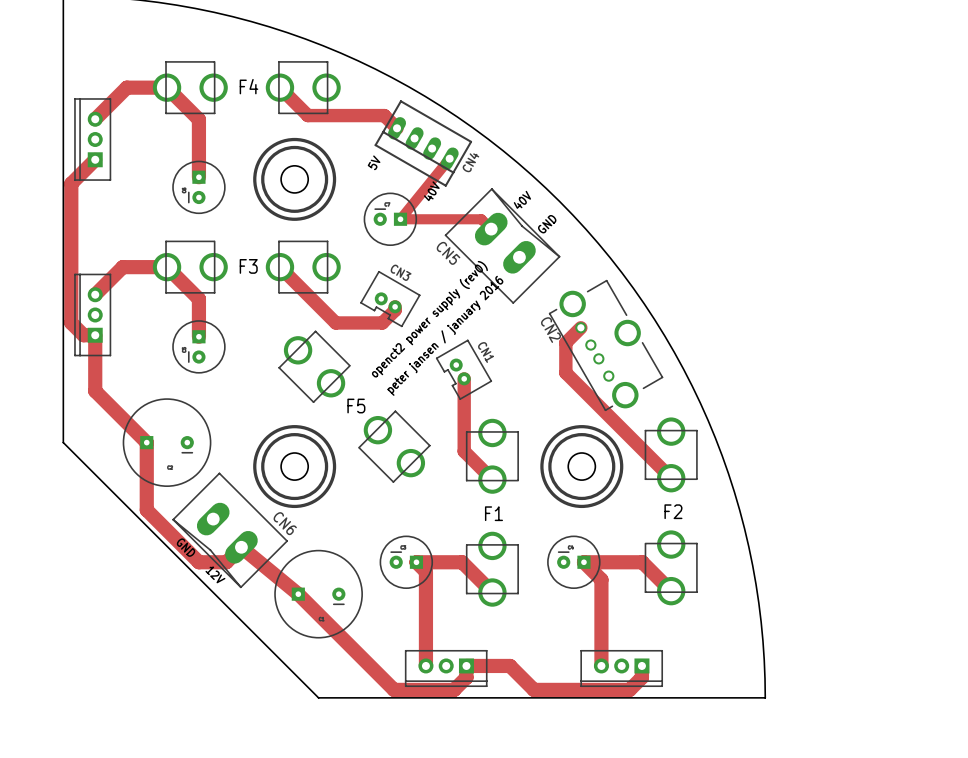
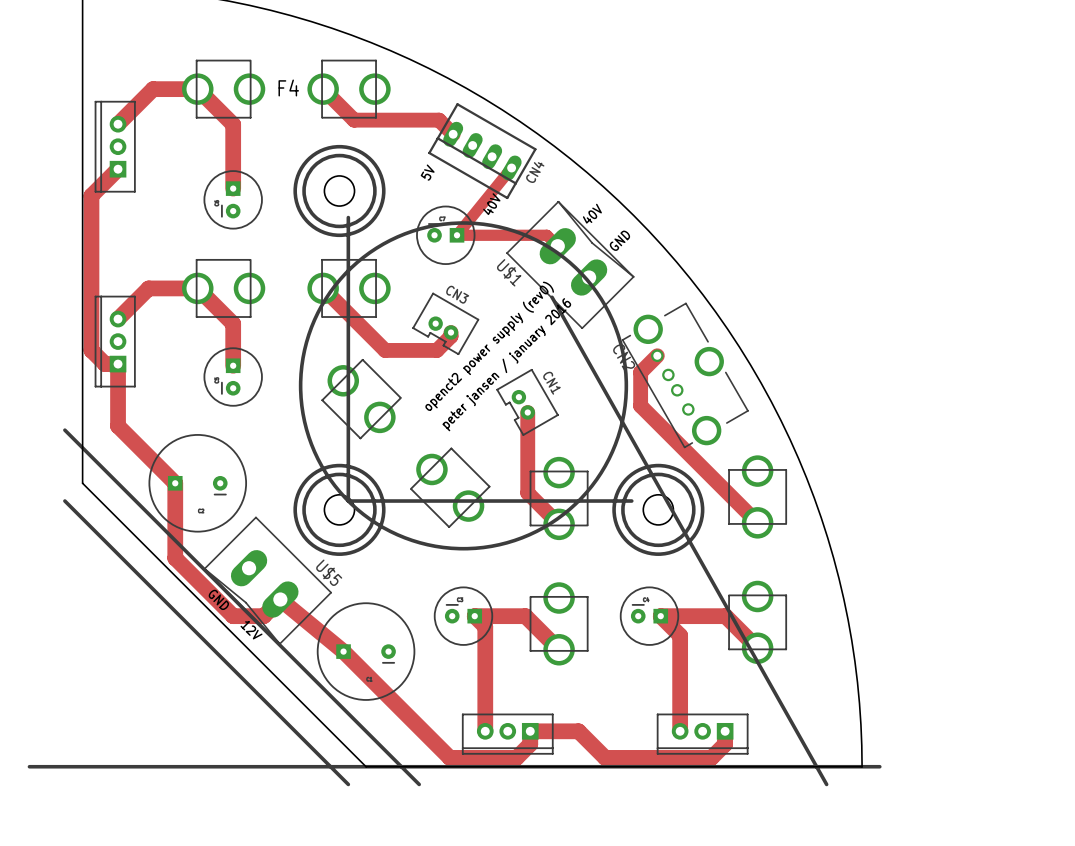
line: none -> (348, 217) (348, 501) (631, 501)
drawing: none -> [298, 221, 629, 551]
CN5 name: CN5 (448, 253) -> U$1 (509, 272)
text: F3 (248, 266) -> none
line: none -> (552, 297) (826, 784)
line: none -> (64, 430) (419, 784)
text: F5 (356, 406) -> none
line: none -> (64, 501) (348, 784)
text: F2 (673, 511) -> none
text: F1 (493, 513) -> none
CN6 name: CN6 (285, 523) -> U$5 (329, 572)
line: none -> (29, 766) (879, 766)

